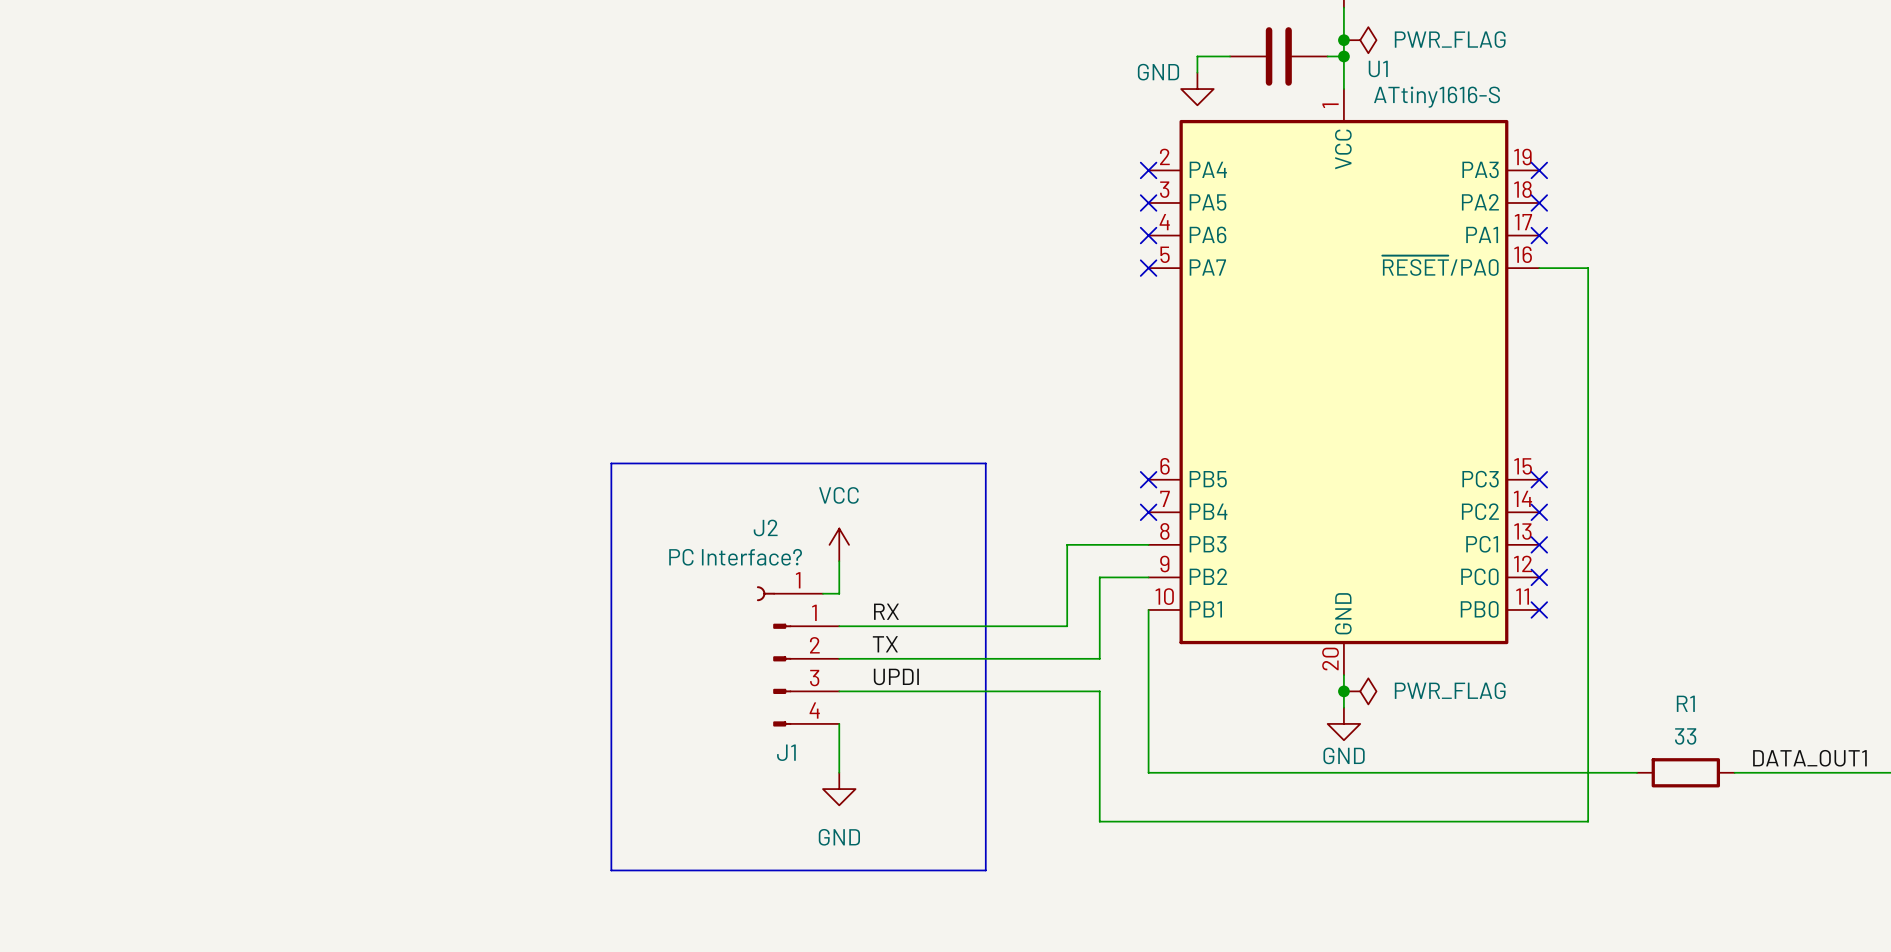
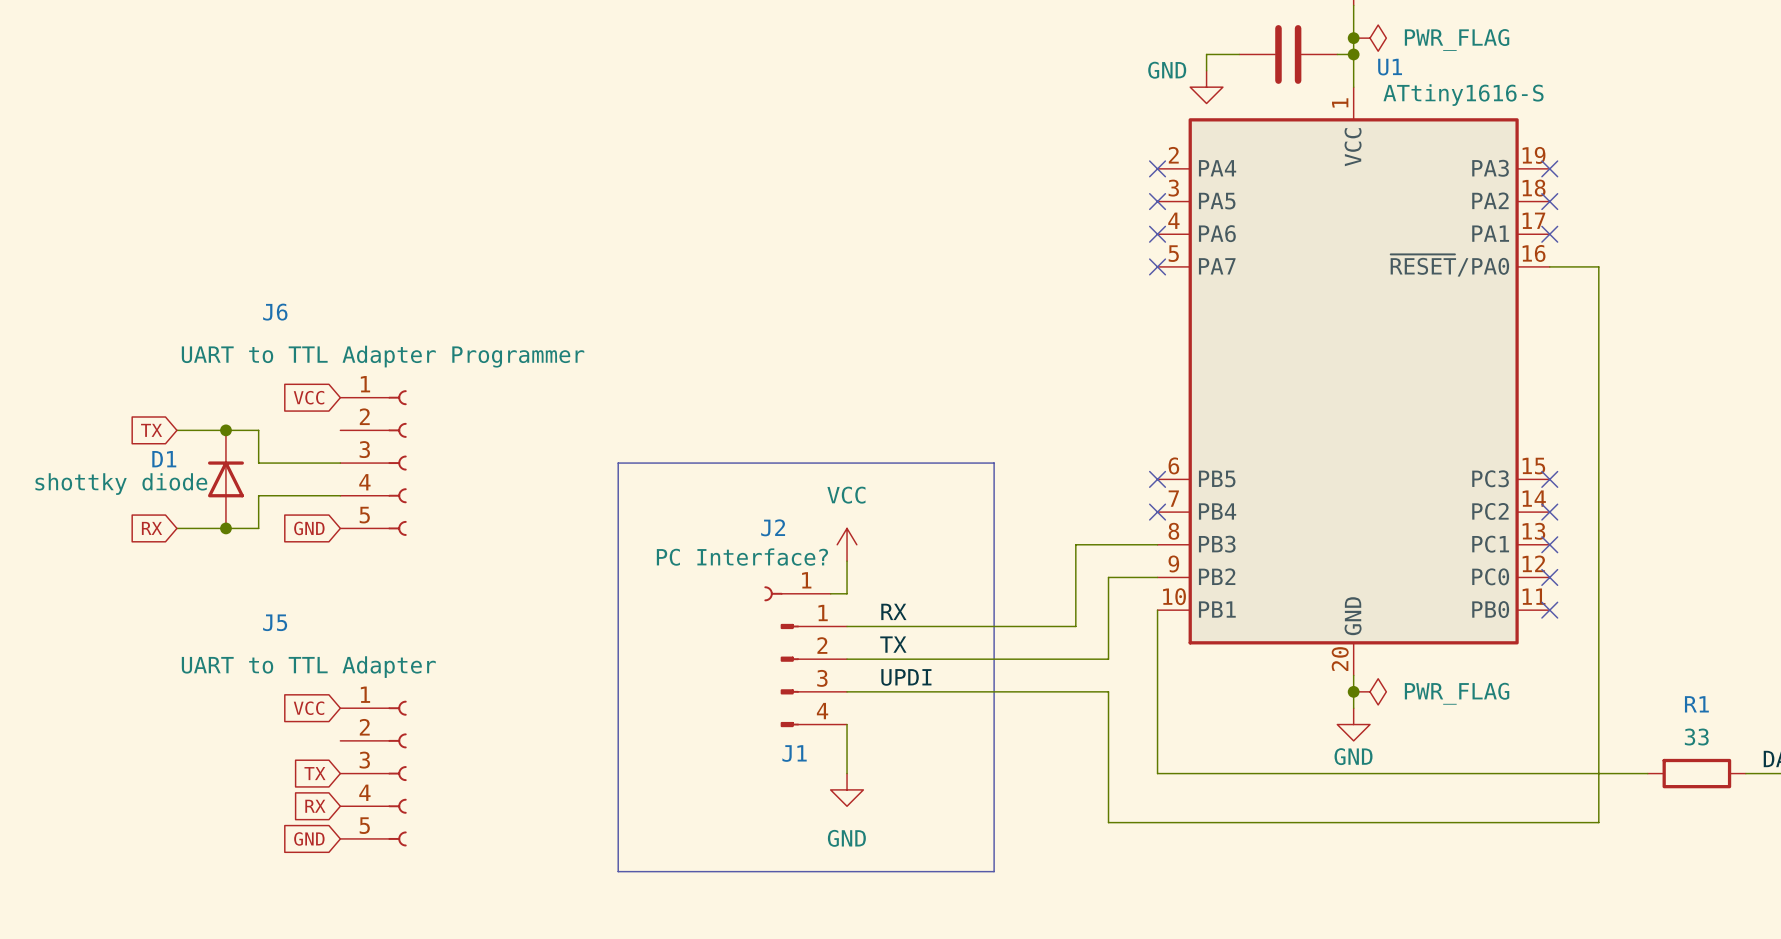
global label: none -> VCC (309, 397)
global label: none -> TX (151, 430)
wire: none -> (176, 430) (258, 430) (258, 463) (340, 463)
junction: none -> (225, 430)
J6: none -> UART to TTL Adapter Programmer (373, 463)
D1: none -> shottky diode (225, 479)
wire: none -> (340, 495) (258, 495) (258, 528) (176, 528)
global label: none -> RX (151, 528)
junction: none -> (225, 528)
global label: none -> GND (309, 528)
global label: none -> VCC (309, 708)
global label: none -> TX (314, 773)
J5: none -> UART to TTL Adapter (373, 773)
global label: none -> RX (315, 806)
global label: none -> GND (309, 838)

